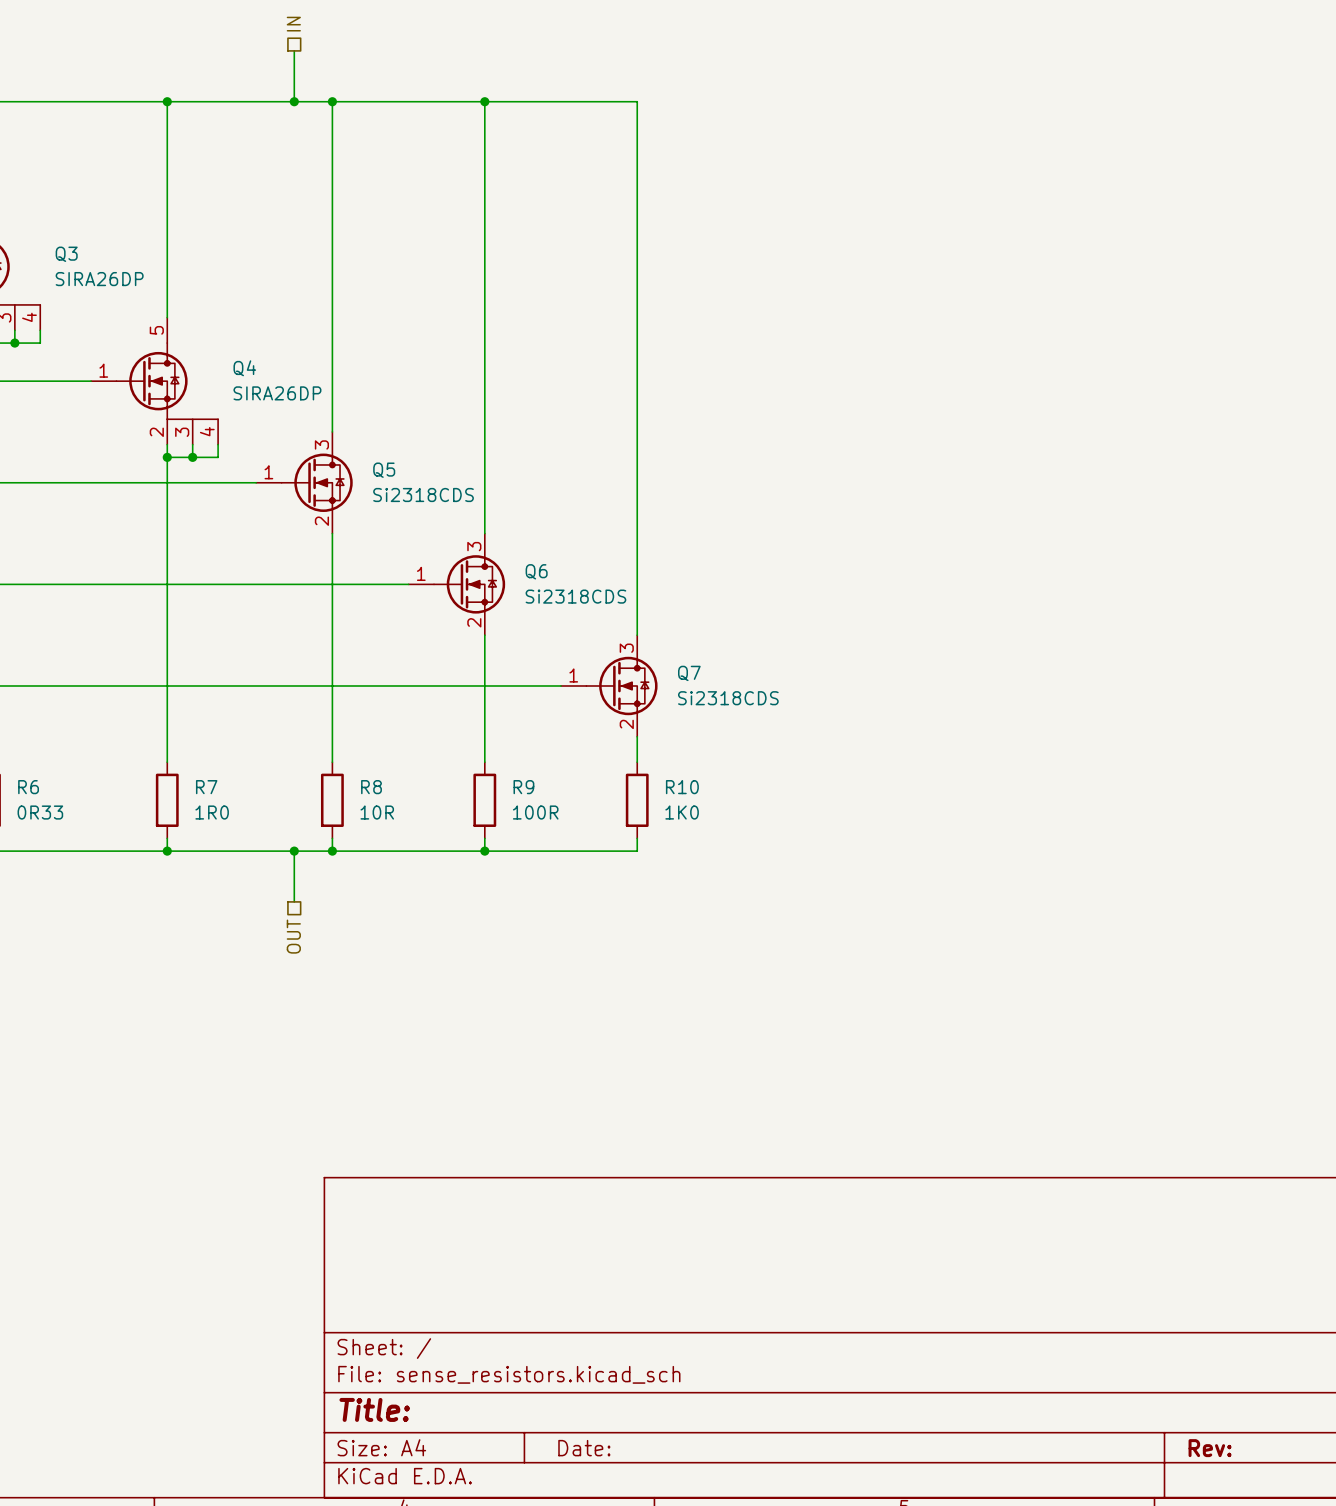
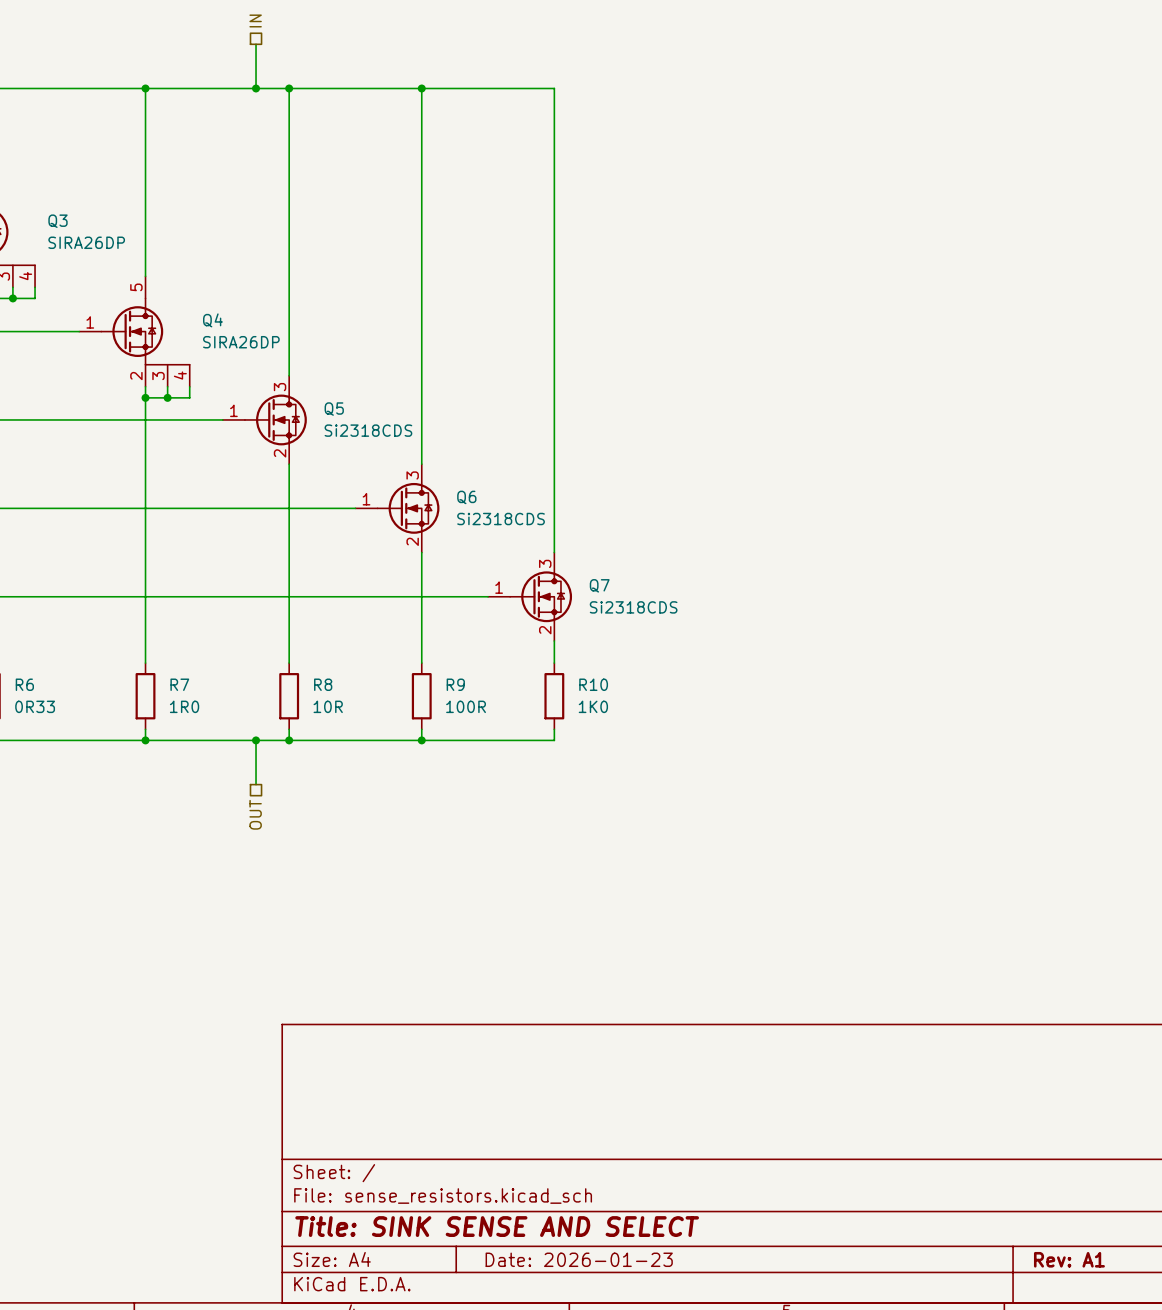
title block: Title: (374, 1409) -> Title: SINK SENSE AND SELECT (497, 1226)
title block: Date: (584, 1448) -> Date: 2026-01-23 (579, 1259)
title block: Rev: (1210, 1448) -> Rev: A1 (1069, 1259)

